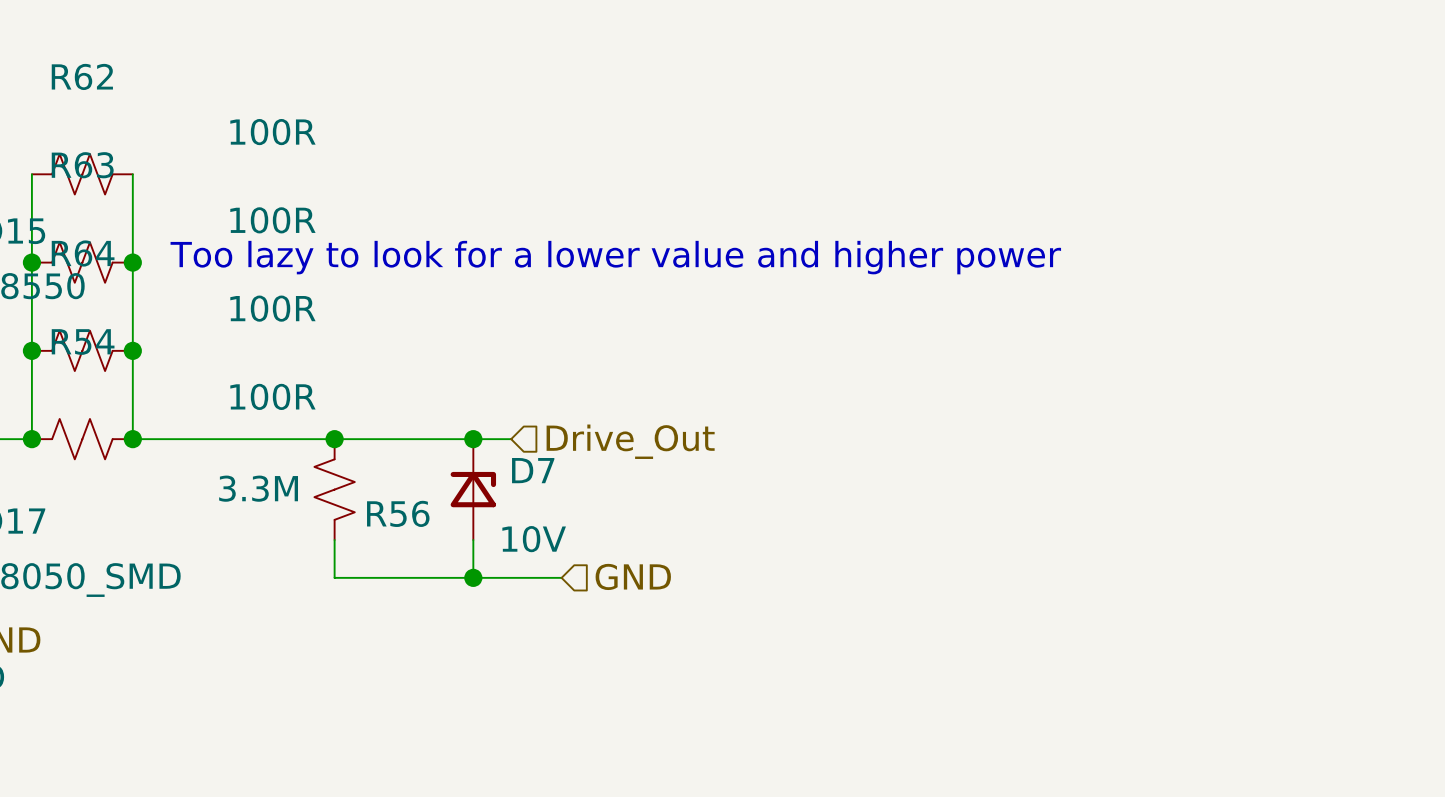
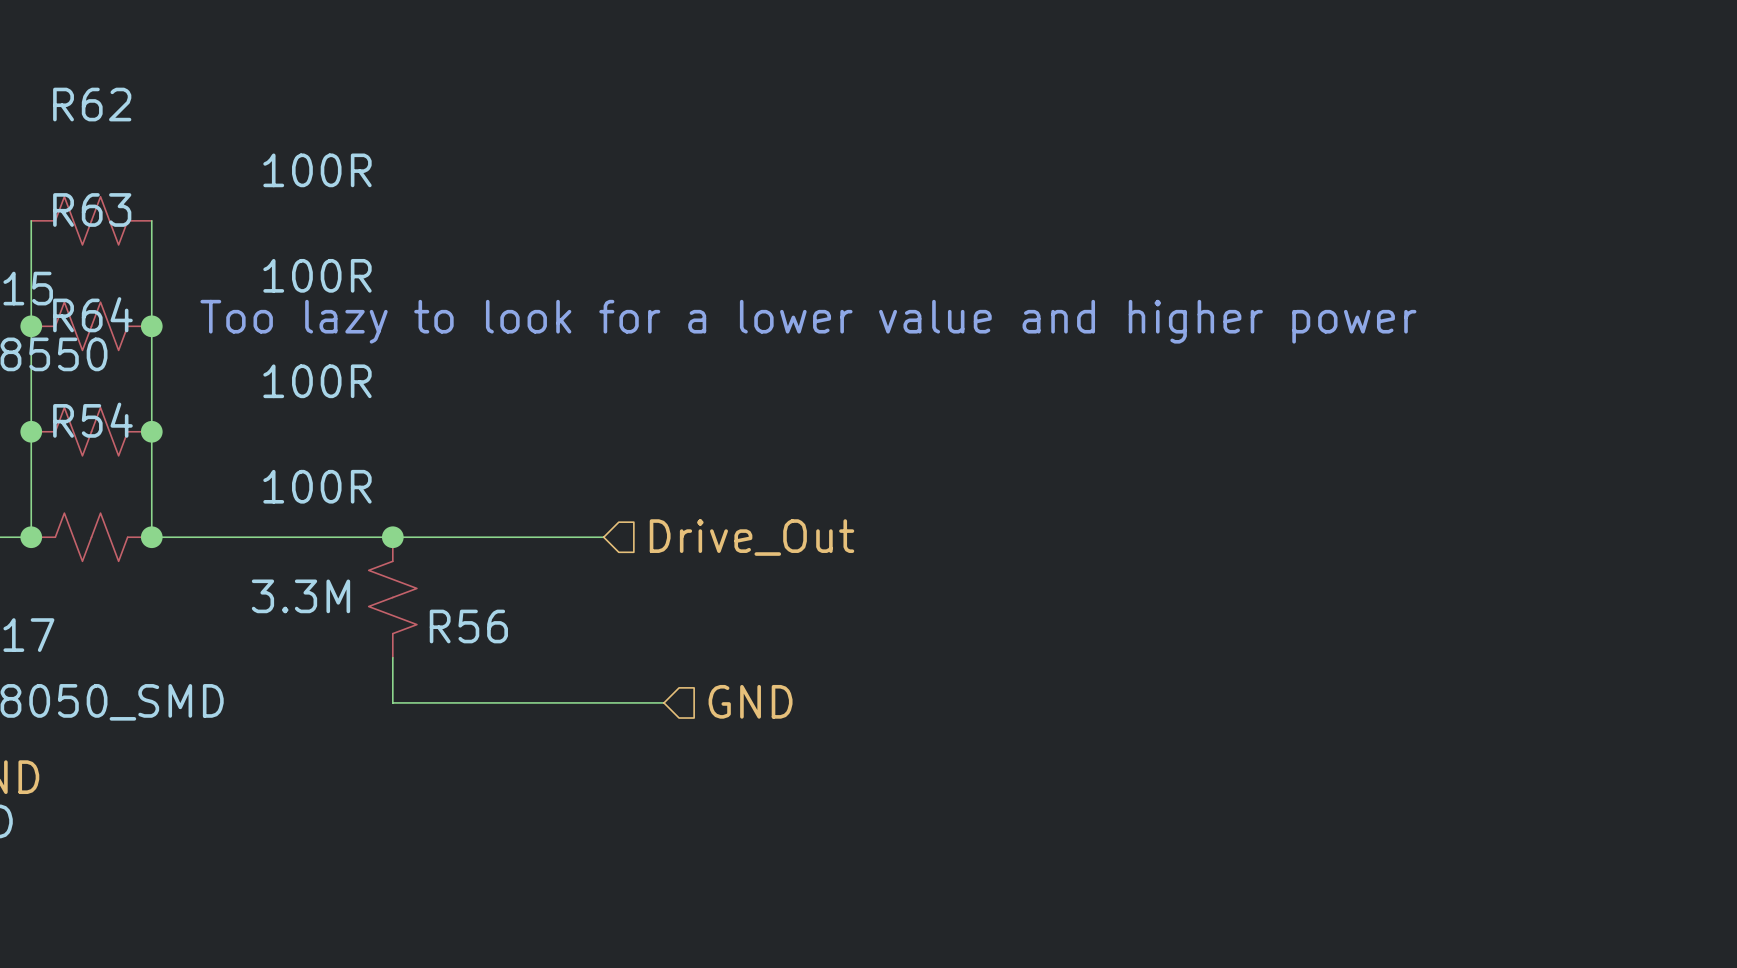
junction: (473, 439) -> none
D7: 10V (473, 489) -> none
wire: (473, 540) (473, 577) -> none
junction: (473, 577) -> none

